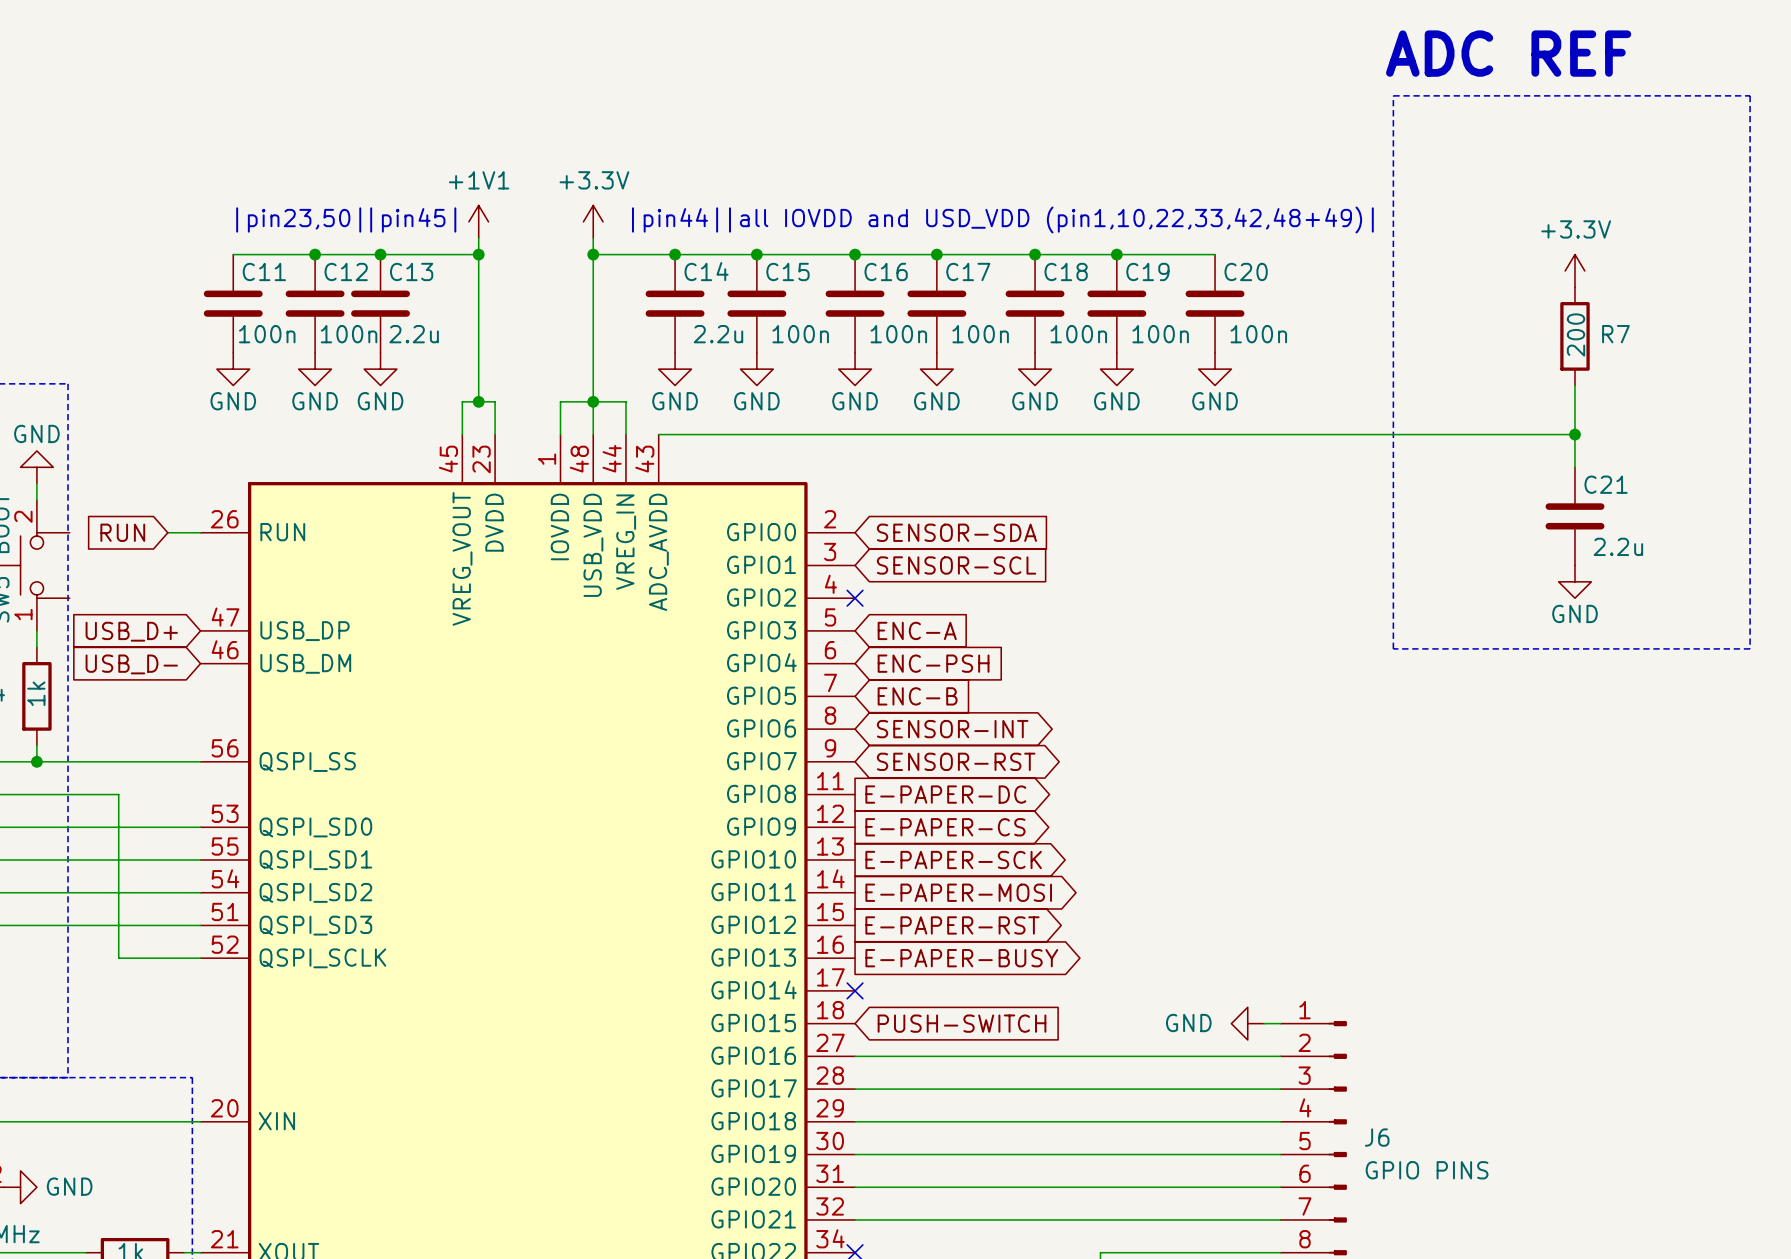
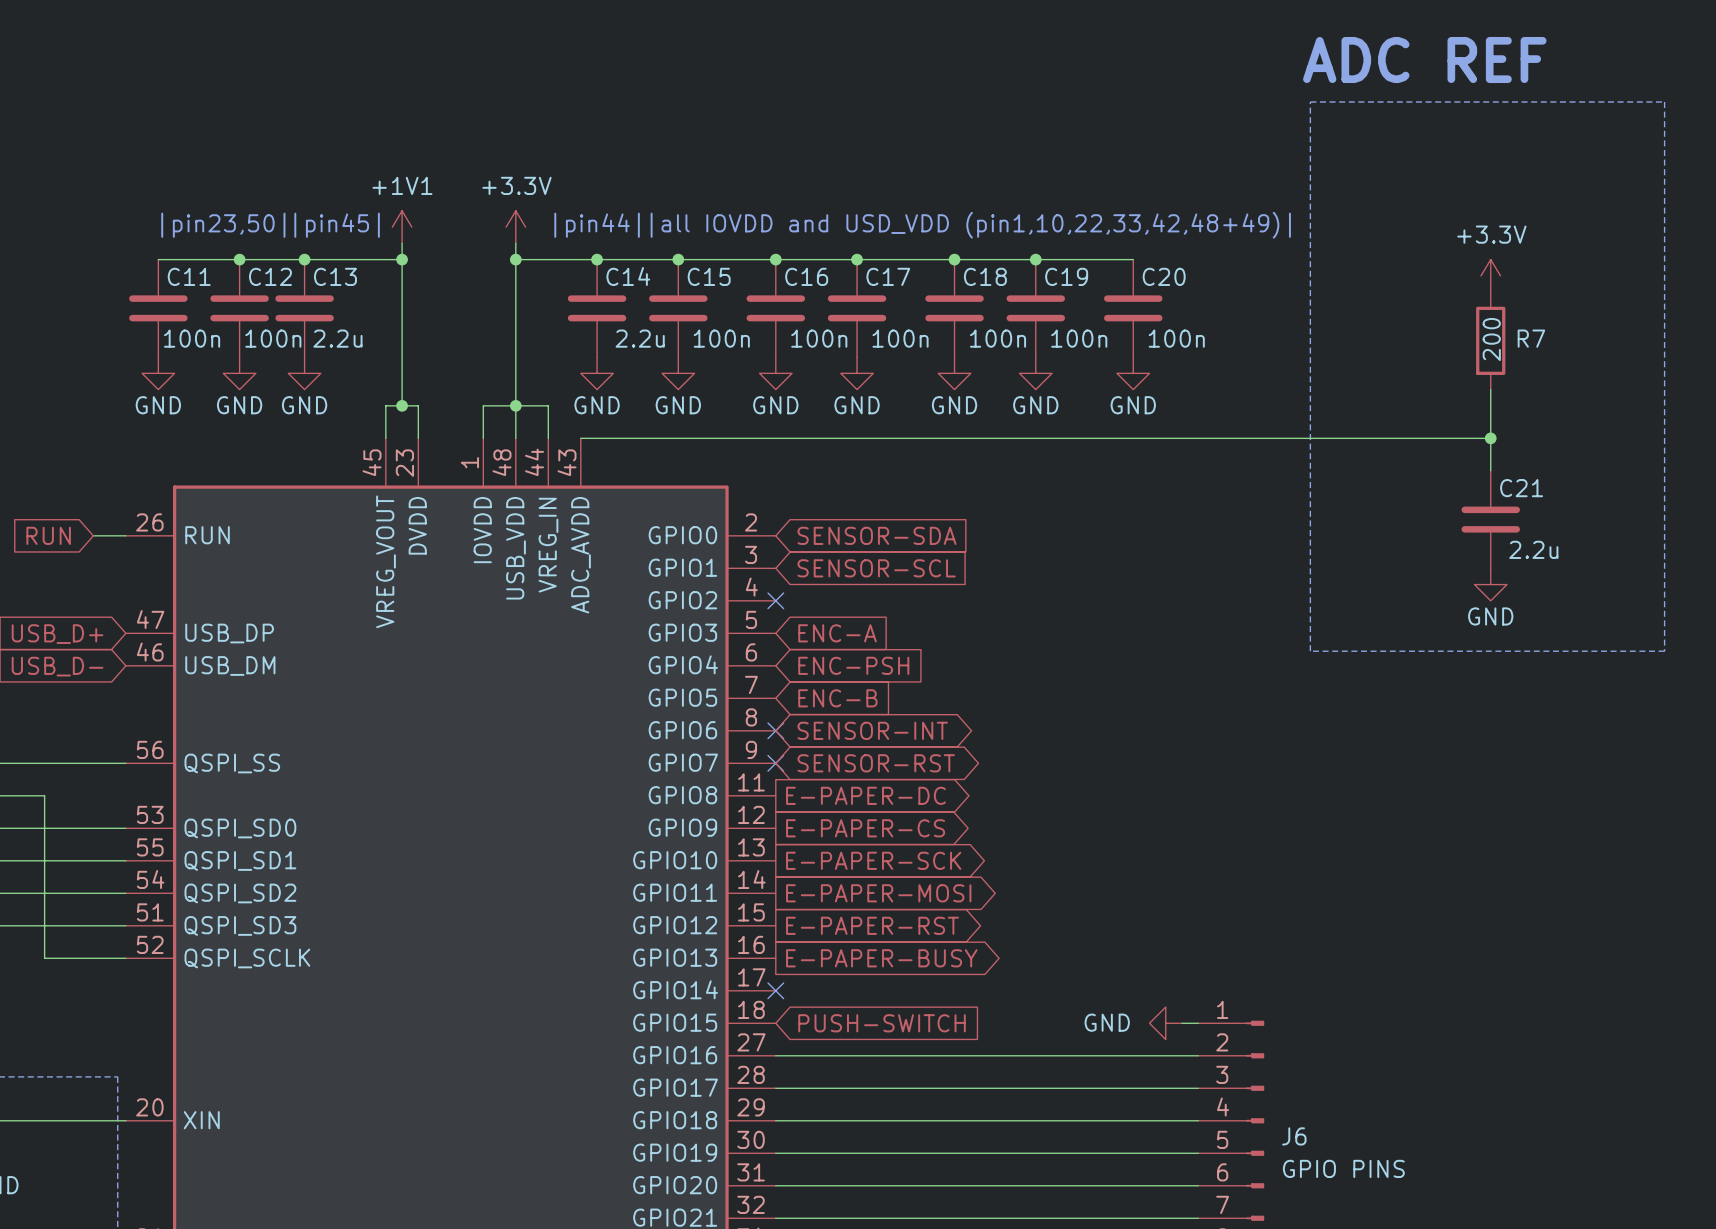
no-connect mark: none -> (775, 730)
no-connect mark: none -> (775, 763)

